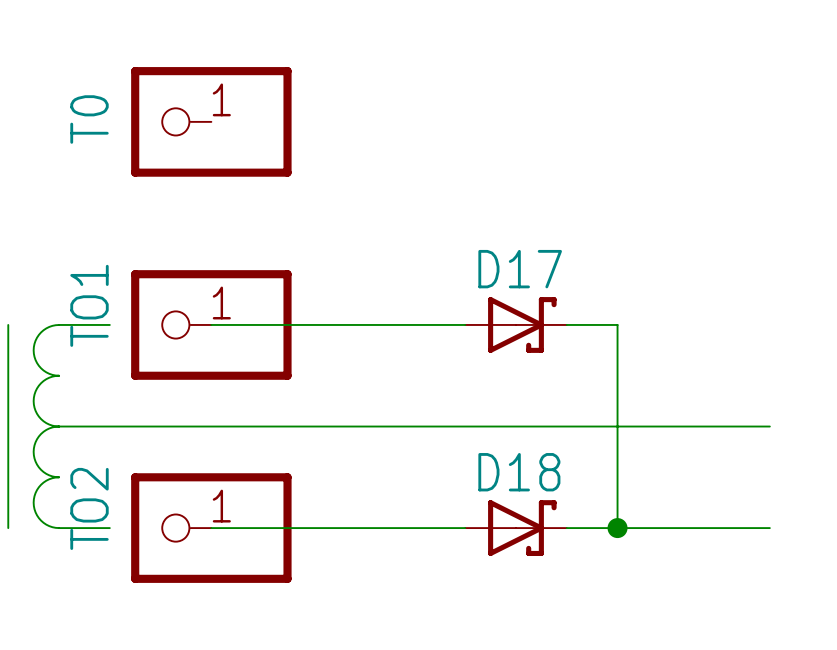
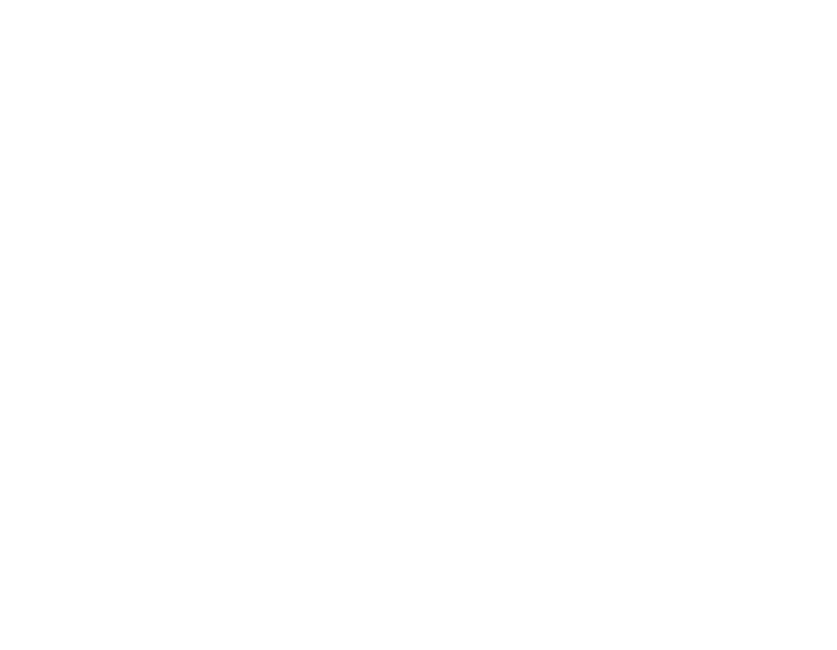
T0: (211, 121) -> none
wire: (8, 324) (8, 528) -> none
wire: (109, 324) (55, 325) (46, 328) (37, 337) (33, 350) (37, 363) (46, 372) (59, 375) (46, 379) (38, 385) (34, 394) (34, 407) (43, 421) (59, 426) -> none
wire: (211, 324) (465, 324) -> none
TO1: (211, 324) -> none
D17: (515, 324) -> none
wire: (566, 324) (617, 324) (617, 528) -> none
wire: (59, 426) (769, 426) -> none
wire: (59, 426) (43, 431) (34, 445) (34, 458) (38, 467) (46, 473) (59, 477) (46, 480) (37, 489) (33, 502) (37, 515) (46, 524) (55, 527) (109, 528) -> none
wire: (211, 528) (465, 528) -> none
TO2: (211, 528) -> none
D18: (515, 528) -> none
wire: (566, 528) (769, 528) -> none
junction: (617, 528) -> none

